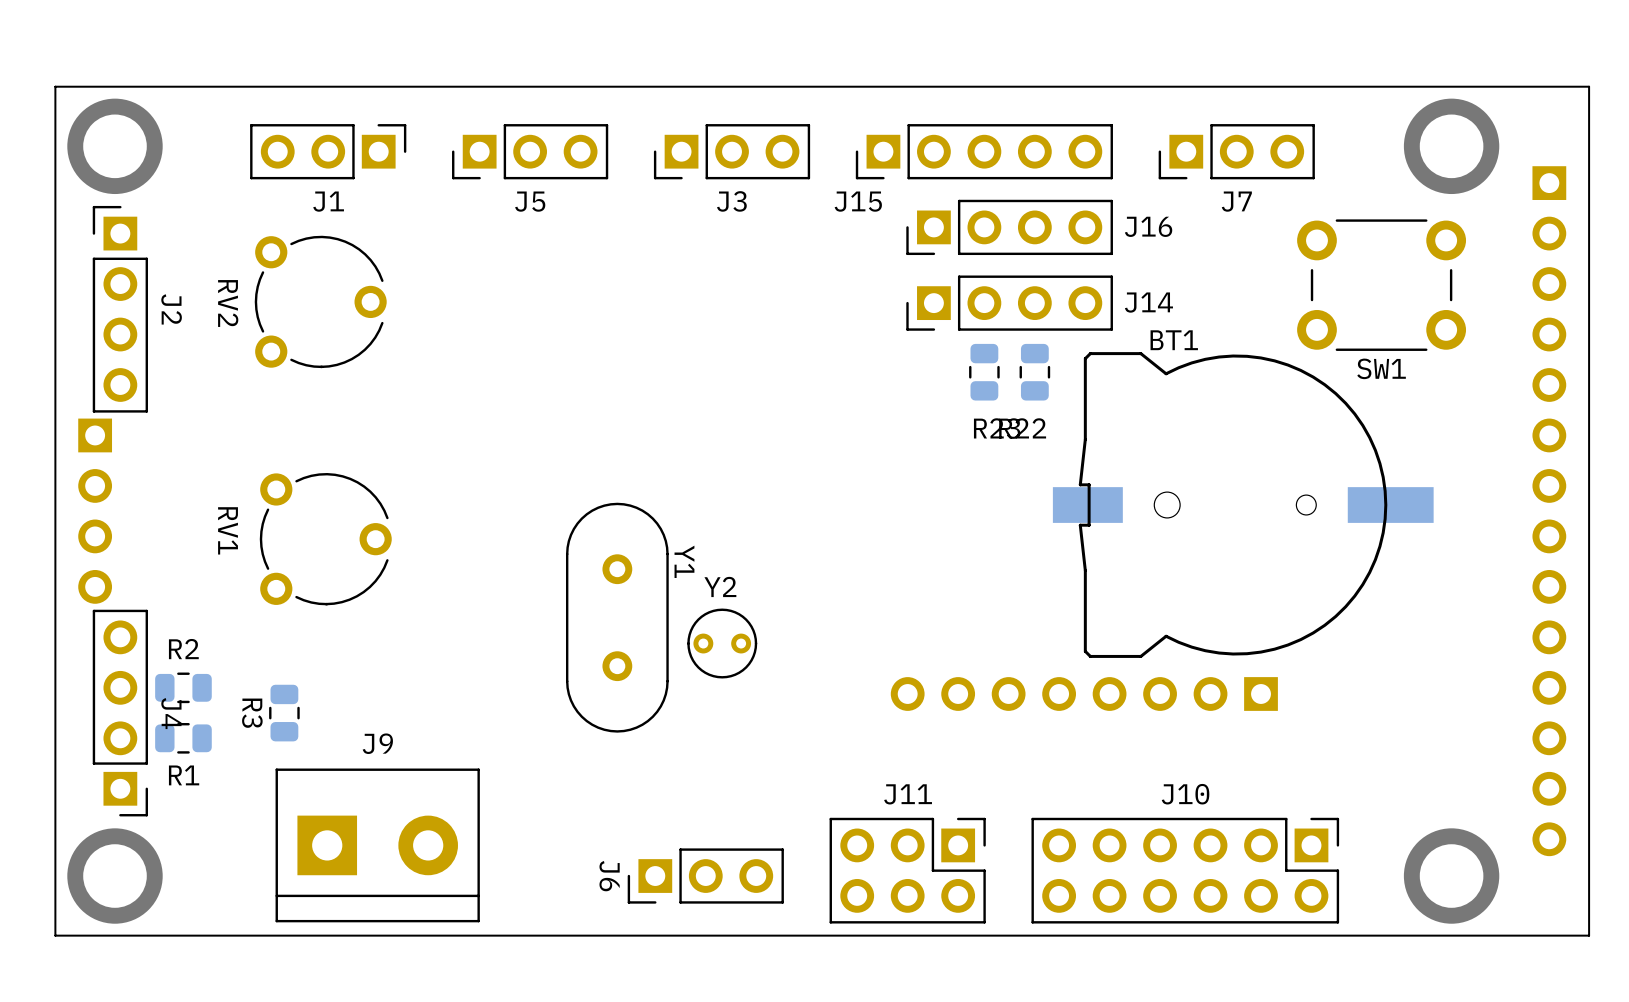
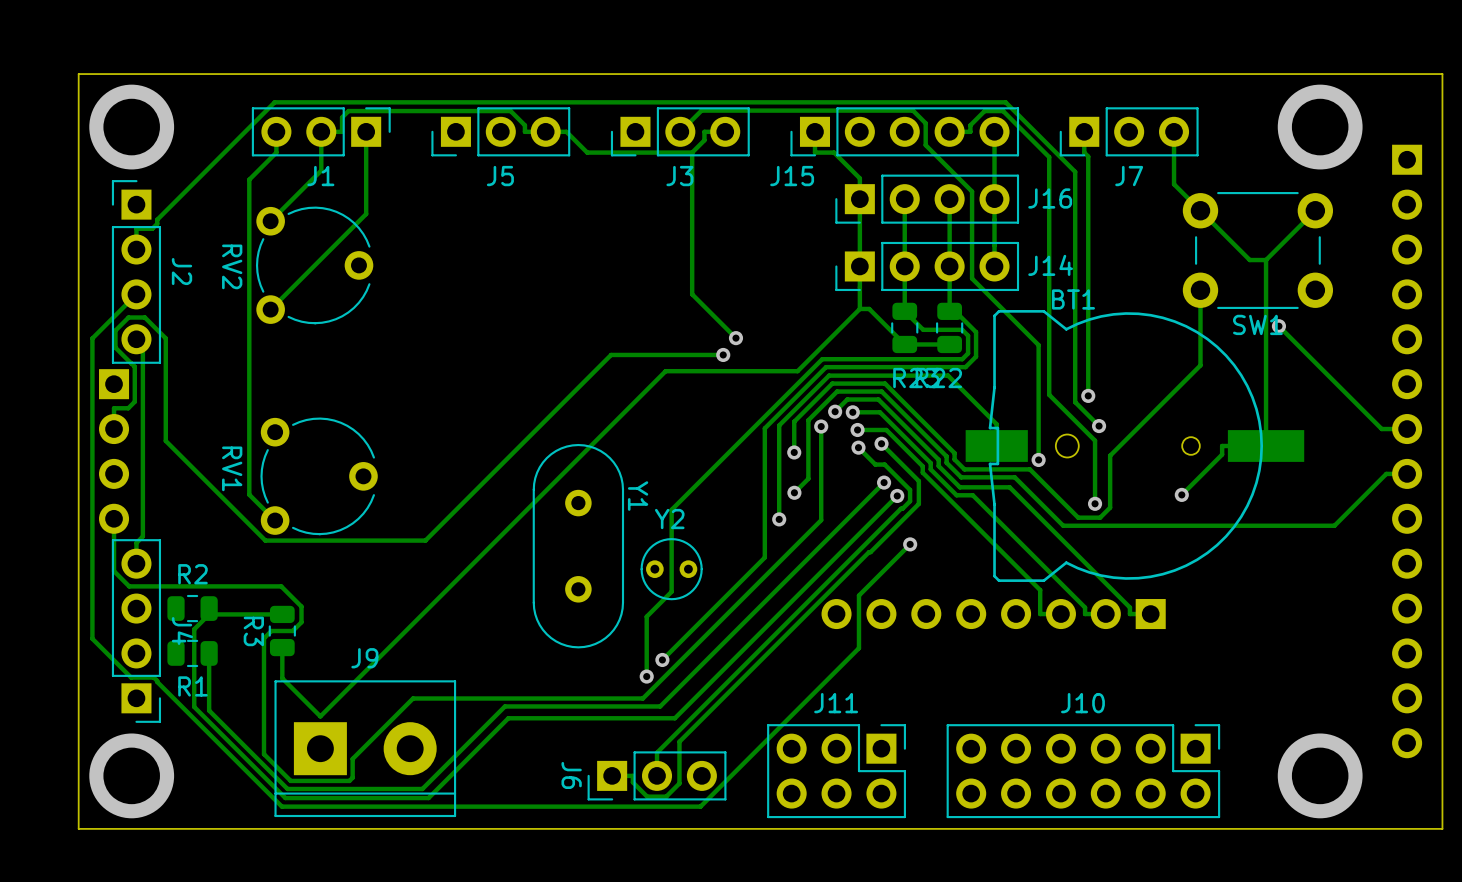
track: none -> (276, 131) (276, 152) (249, 179) (249, 494) (275, 520)
track: none -> (366, 131) (366, 214) (270, 309)
track: none -> (680, 131) (701, 110) (912, 110) (925, 123) (925, 145) (972, 191) (972, 278) (1038, 345) (1038, 459)
track: none -> (725, 131) (704, 131) (704, 140) (692, 152)
track: none -> (814, 131) (814, 152) (834, 152) (859, 178) (859, 308)
track: none -> (949, 131) (970, 131) (970, 125) (984, 111) (1003, 111) (1049, 157) (1049, 394) (1095, 440) (1095, 503)
track: none -> (994, 131) (994, 266)
track: none -> (1084, 131) (1084, 152) (1088, 156) (1088, 395)
track: none -> (1174, 131) (1174, 184) (1249, 260) (1266, 260)
track: none -> (692, 152) (692, 294) (735, 338)
track: none -> (692, 152) (587, 152) (566, 131) (524, 131) (524, 125) (510, 111) (348, 111) (342, 117) (342, 131) (321, 131) (321, 170) (270, 221)
track: none -> (904, 199) (904, 311) (923, 329) (962, 329) (968, 335) (968, 353) (962, 359) (822, 359) (671, 509) (671, 591) (646, 616) (646, 676)
track: none -> (949, 199) (949, 311) (955, 311) (976, 332) (976, 356) (965, 367) (826, 367) (764, 428) (764, 557) (662, 659)
track: none -> (1315, 210) (1266, 260)
track: none -> (136, 249) (136, 228) (152, 228) (157, 223) (157, 219) (274, 102) (1005, 102) (1075, 171) (1075, 402) (1099, 426)
track: none -> (1266, 260) (1266, 446) (1222, 446) (1222, 454) (1181, 494)
track: none -> (1200, 290) (1200, 365) (1110, 455) (1110, 507) (1100, 517) (1078, 517) (1029, 469) (964, 469) (954, 459) (954, 453) (884, 383) (832, 383) (794, 421) (794, 452)
track: none -> (136, 294) (92, 338) (92, 638) (131, 677) (153, 677) (281, 806) (700, 806) (858, 648) (858, 595) (910, 544)
track: none -> (859, 308) (797, 371) (665, 371) (320, 716) (282, 678) (282, 647)
track: none -> (859, 308) (869, 308) (904, 344) (949, 344)
track: none -> (1278, 326) (1381, 429) (1407, 429)
via: none -> (1278, 326)
via: none -> (735, 338)
track: none -> (136, 339) (142, 345) (142, 536) (136, 542) (136, 563)
track: none -> (723, 354) (611, 354) (425, 540) (265, 540) (165, 440) (165, 338) (144, 317) (128, 317) (115, 330) (115, 347) (134, 366) (134, 401) (128, 408) (114, 408) (114, 429)
via: none -> (723, 354)
via: none -> (1088, 395)
track: none -> (835, 411) (847, 399) (878, 399) (938, 459) (938, 466) (959, 487) (1009, 487) (1129, 607) (1129, 614) (1150, 614)
via: none -> (835, 411)
track: none -> (852, 412) (879, 412) (930, 463) (930, 469) (956, 495) (972, 495) (1085, 607) (1085, 614) (1105, 614)
via: none -> (852, 412)
via: none -> (1099, 426)
track: none -> (821, 426) (821, 520) (642, 698) (413, 698) (352, 758) (352, 777) (349, 780) (290, 780) (263, 754) (263, 638) (271, 631) (292, 631) (301, 622) (301, 606) (281, 586) (129, 586) (114, 571) (114, 518)
via: none -> (821, 426)
track: none -> (857, 429) (886, 429) (922, 466) (922, 472) (1040, 590) (1040, 614) (1060, 614)
via: none -> (857, 429)
track: none -> (881, 443) (918, 481) (918, 503) (679, 741) (679, 783) (666, 796) (647, 796) (632, 782) (632, 775) (612, 775)
via: none -> (881, 443)
track: none -> (996, 446) (996, 424) (948, 375) (829, 375) (779, 425) (779, 519)
track: none -> (858, 447) (875, 464) (884, 464) (910, 489) (910, 501) (657, 752) (657, 775)
via: none -> (858, 447)
via: none -> (794, 452)
via: none -> (1038, 459)
track: none -> (1407, 473) (1386, 473) (1334, 525) (1063, 525) (1014, 477) (961, 477) (946, 462) (946, 456) (881, 391) (837, 391) (808, 420) (808, 478) (794, 492)
track: none -> (884, 482) (660, 706) (504, 706) (422, 789) (287, 789) (209, 710) (209, 653)
via: none -> (884, 482)
via: none -> (794, 492)
via: none -> (1181, 494)
track: none -> (897, 495) (674, 718) (508, 718) (428, 798) (285, 798) (194, 706) (194, 629) (209, 614)
via: none -> (897, 495)
via: none -> (1095, 503)
via: none -> (779, 519)
via: none -> (910, 544)
track: none -> (282, 614) (209, 614)
via: none -> (662, 659)
via: none -> (646, 676)

